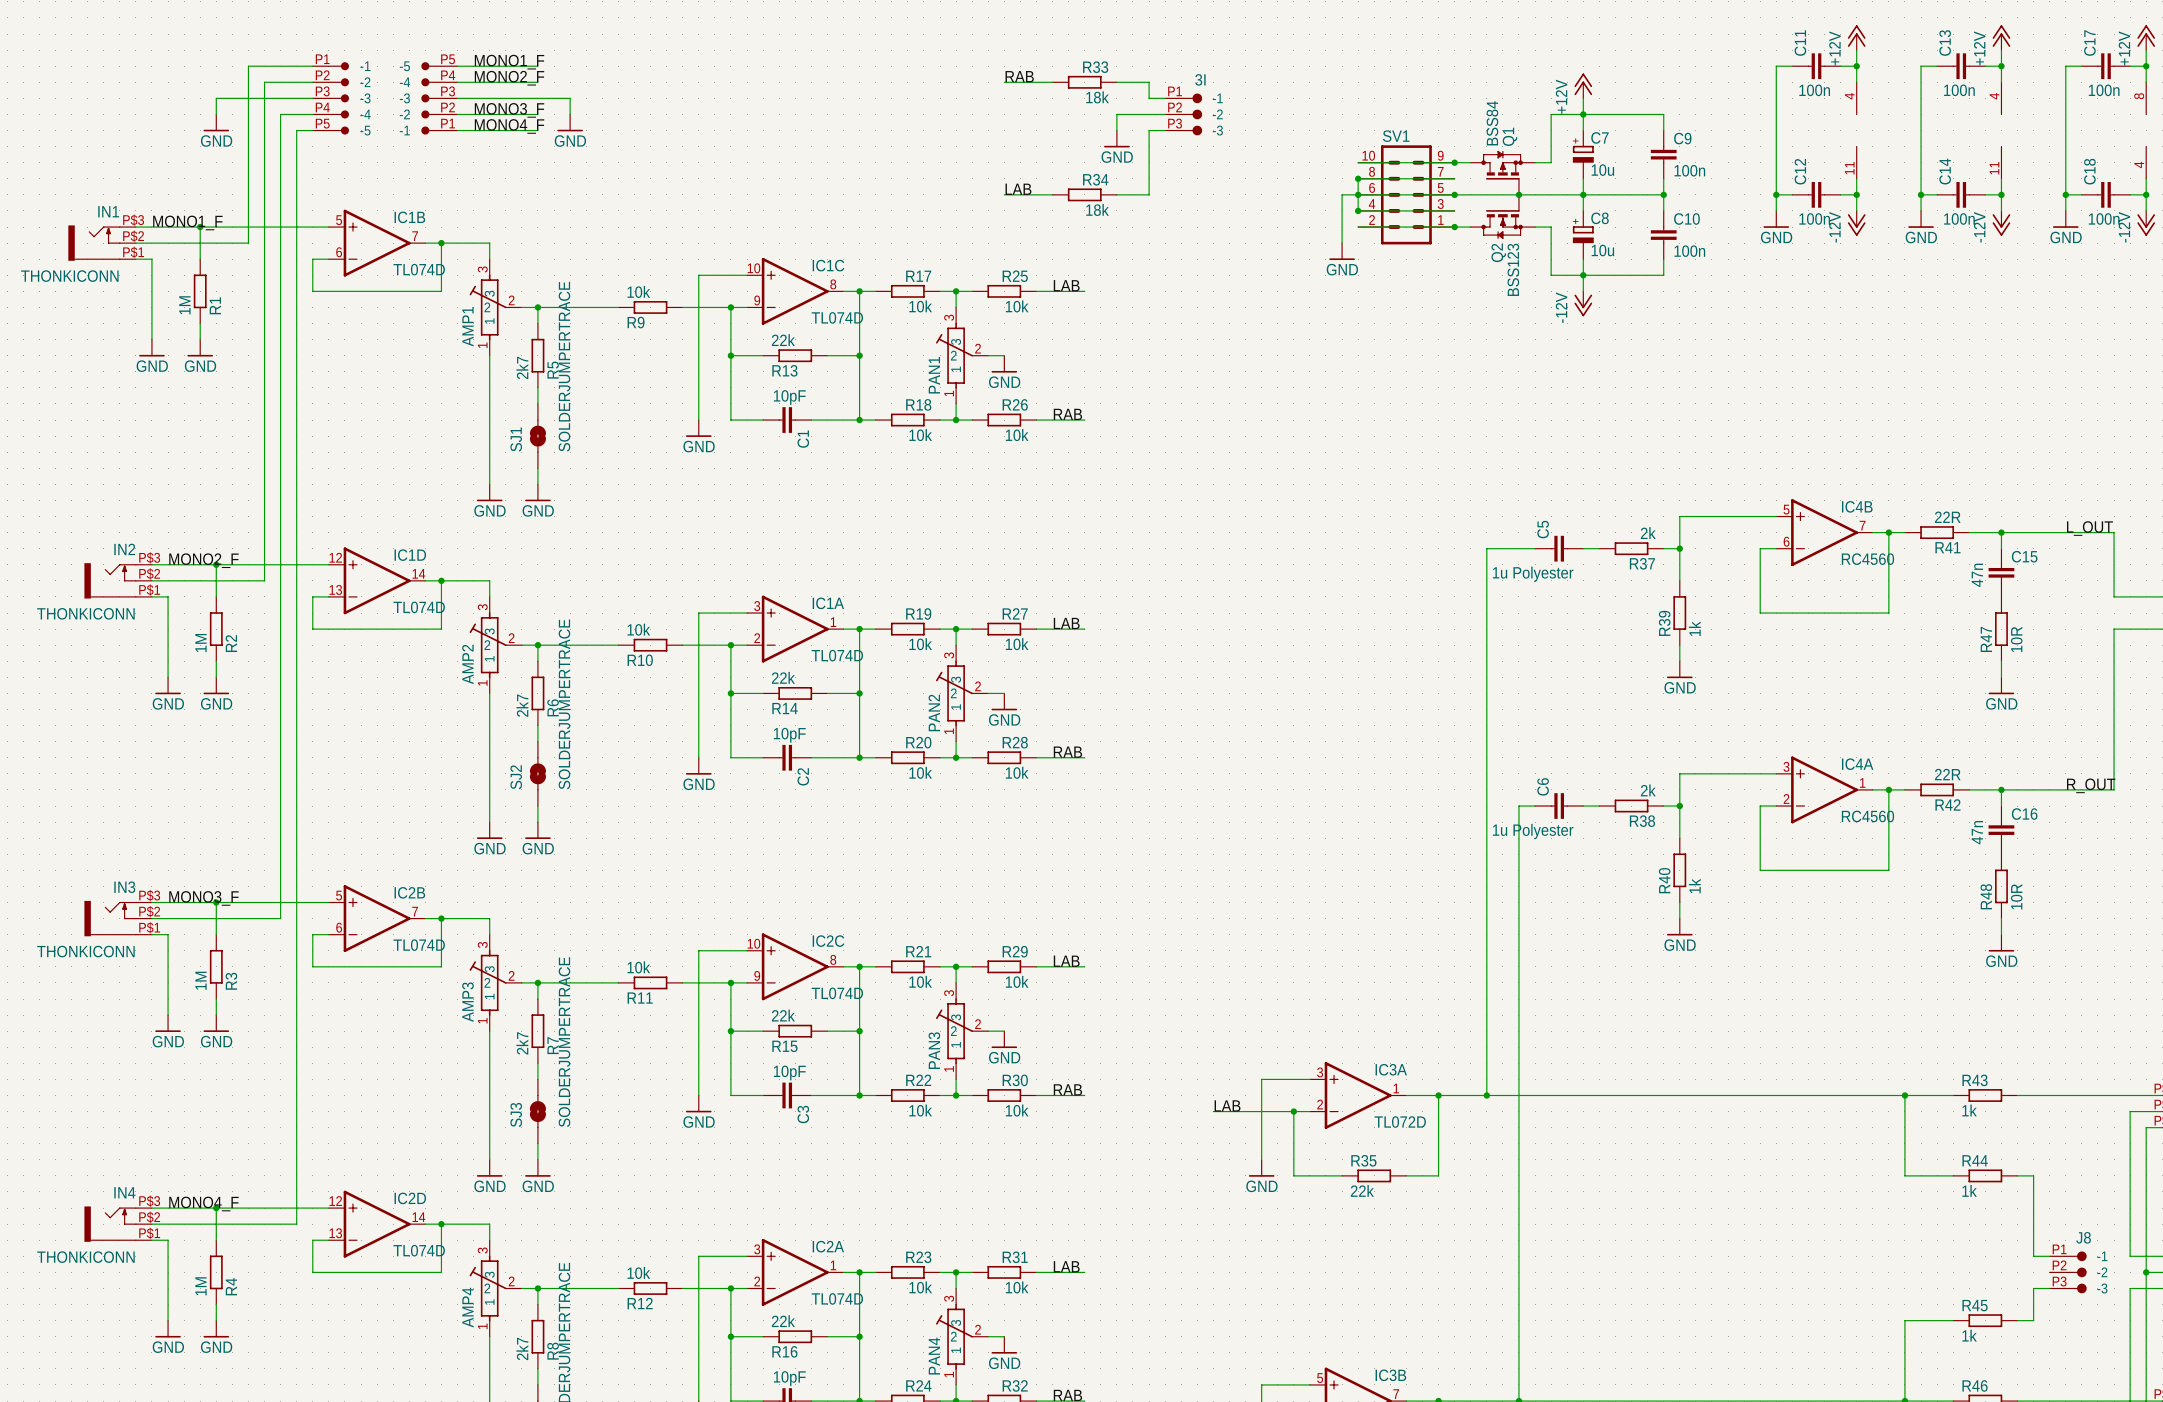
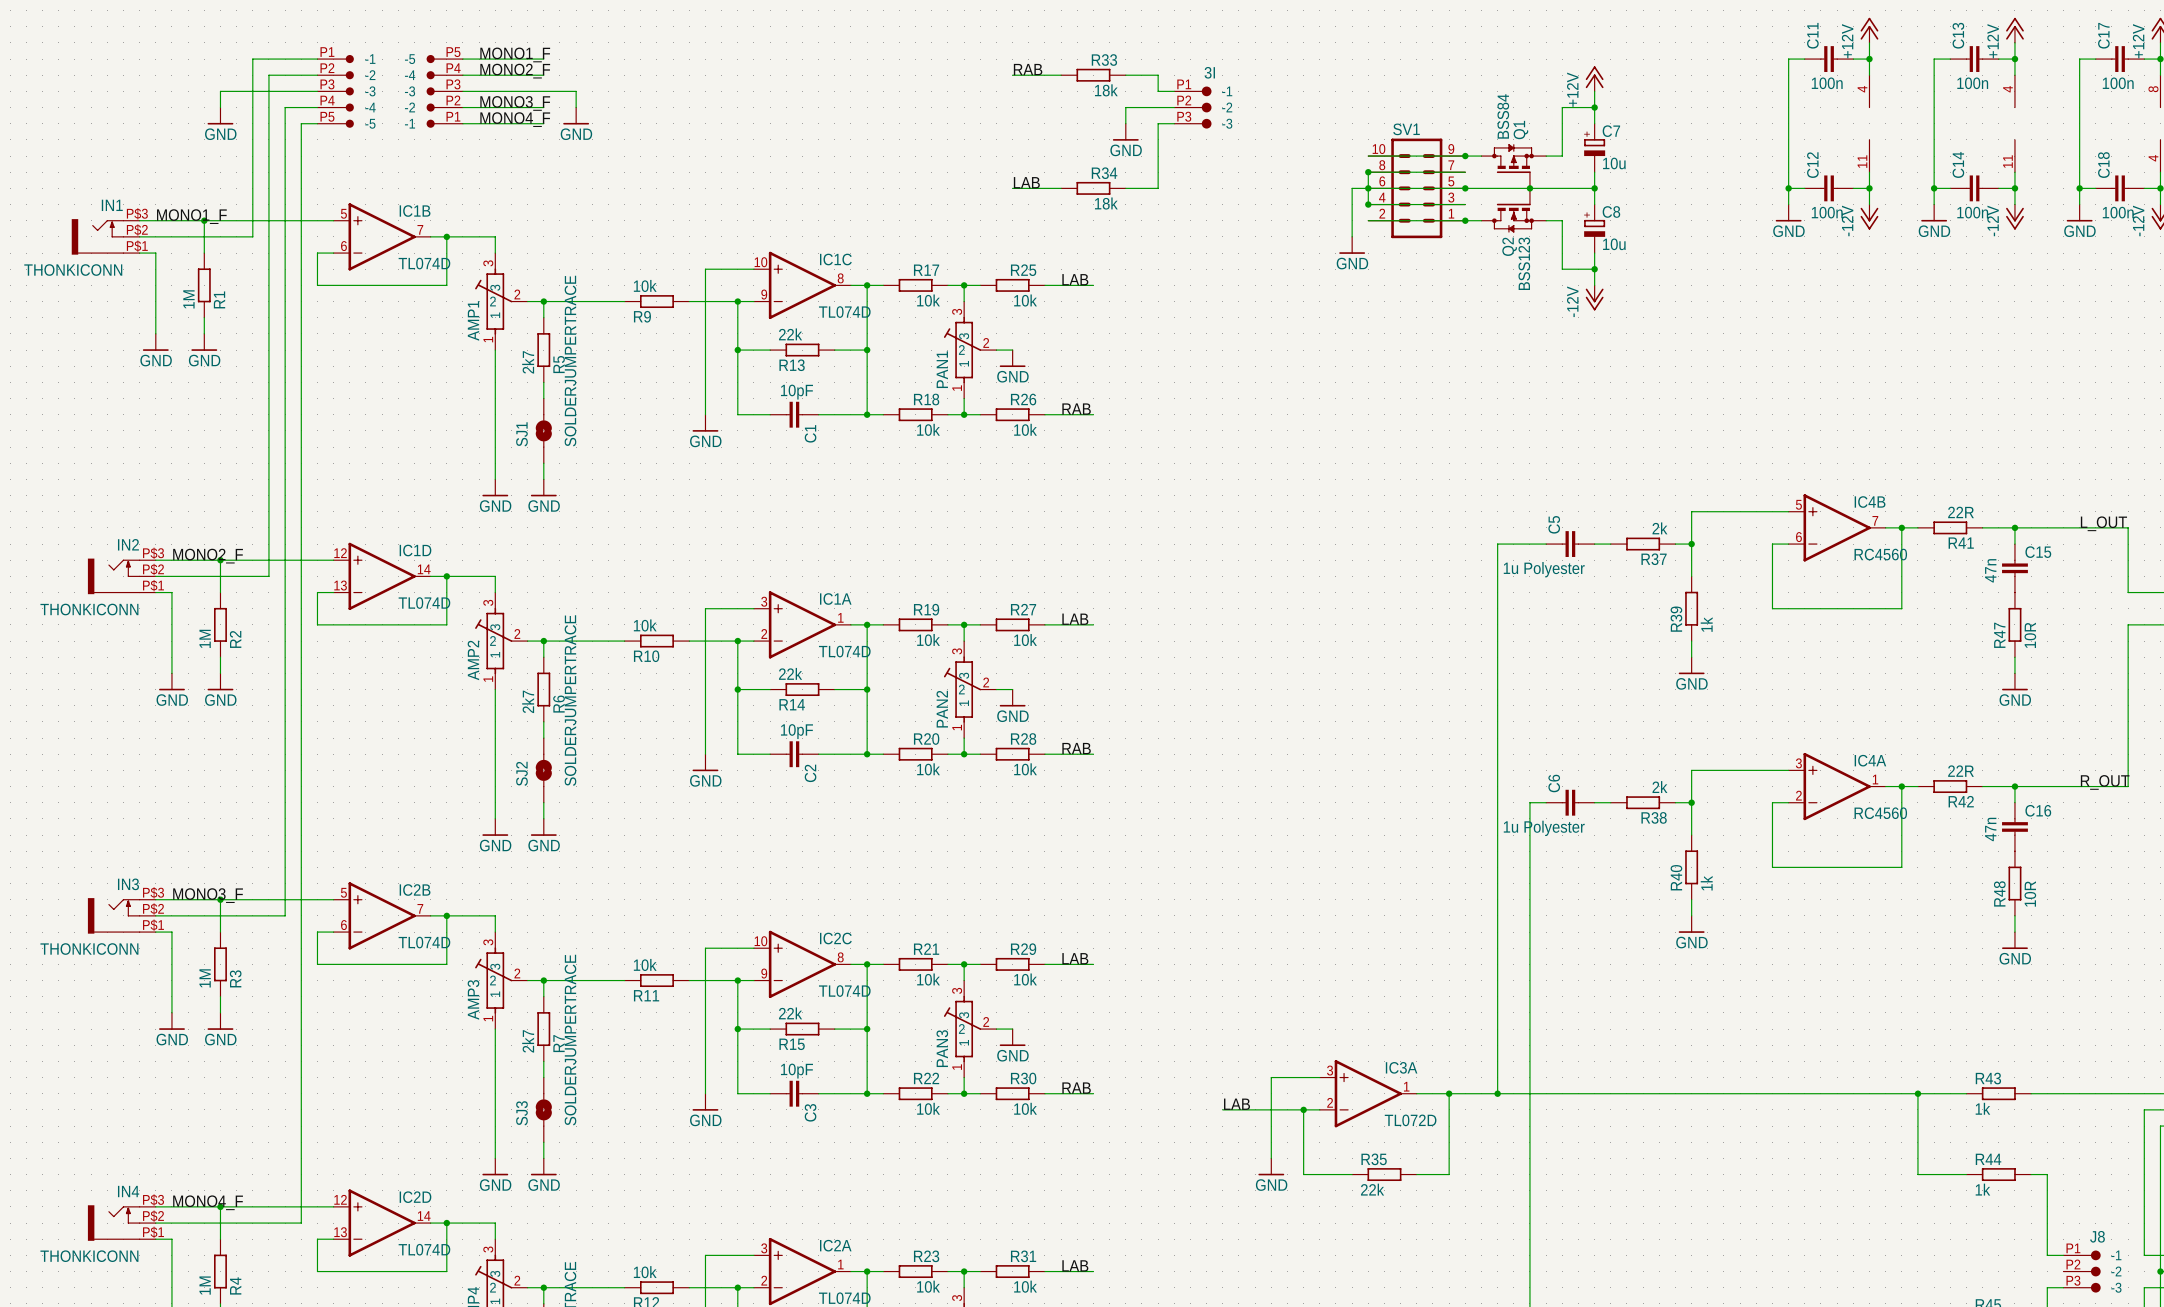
wire: (1583, 114) (1663, 114) (1663, 130) -> none
C9: 100n (1663, 154) -> none
wire: (1663, 178) (1663, 210) -> none
wire: (1583, 194) (1663, 194) -> none
junction: (1663, 194) -> none
C10: 100n (1663, 235) -> none
wire: (1663, 259) (1663, 275) (1583, 275) -> none

